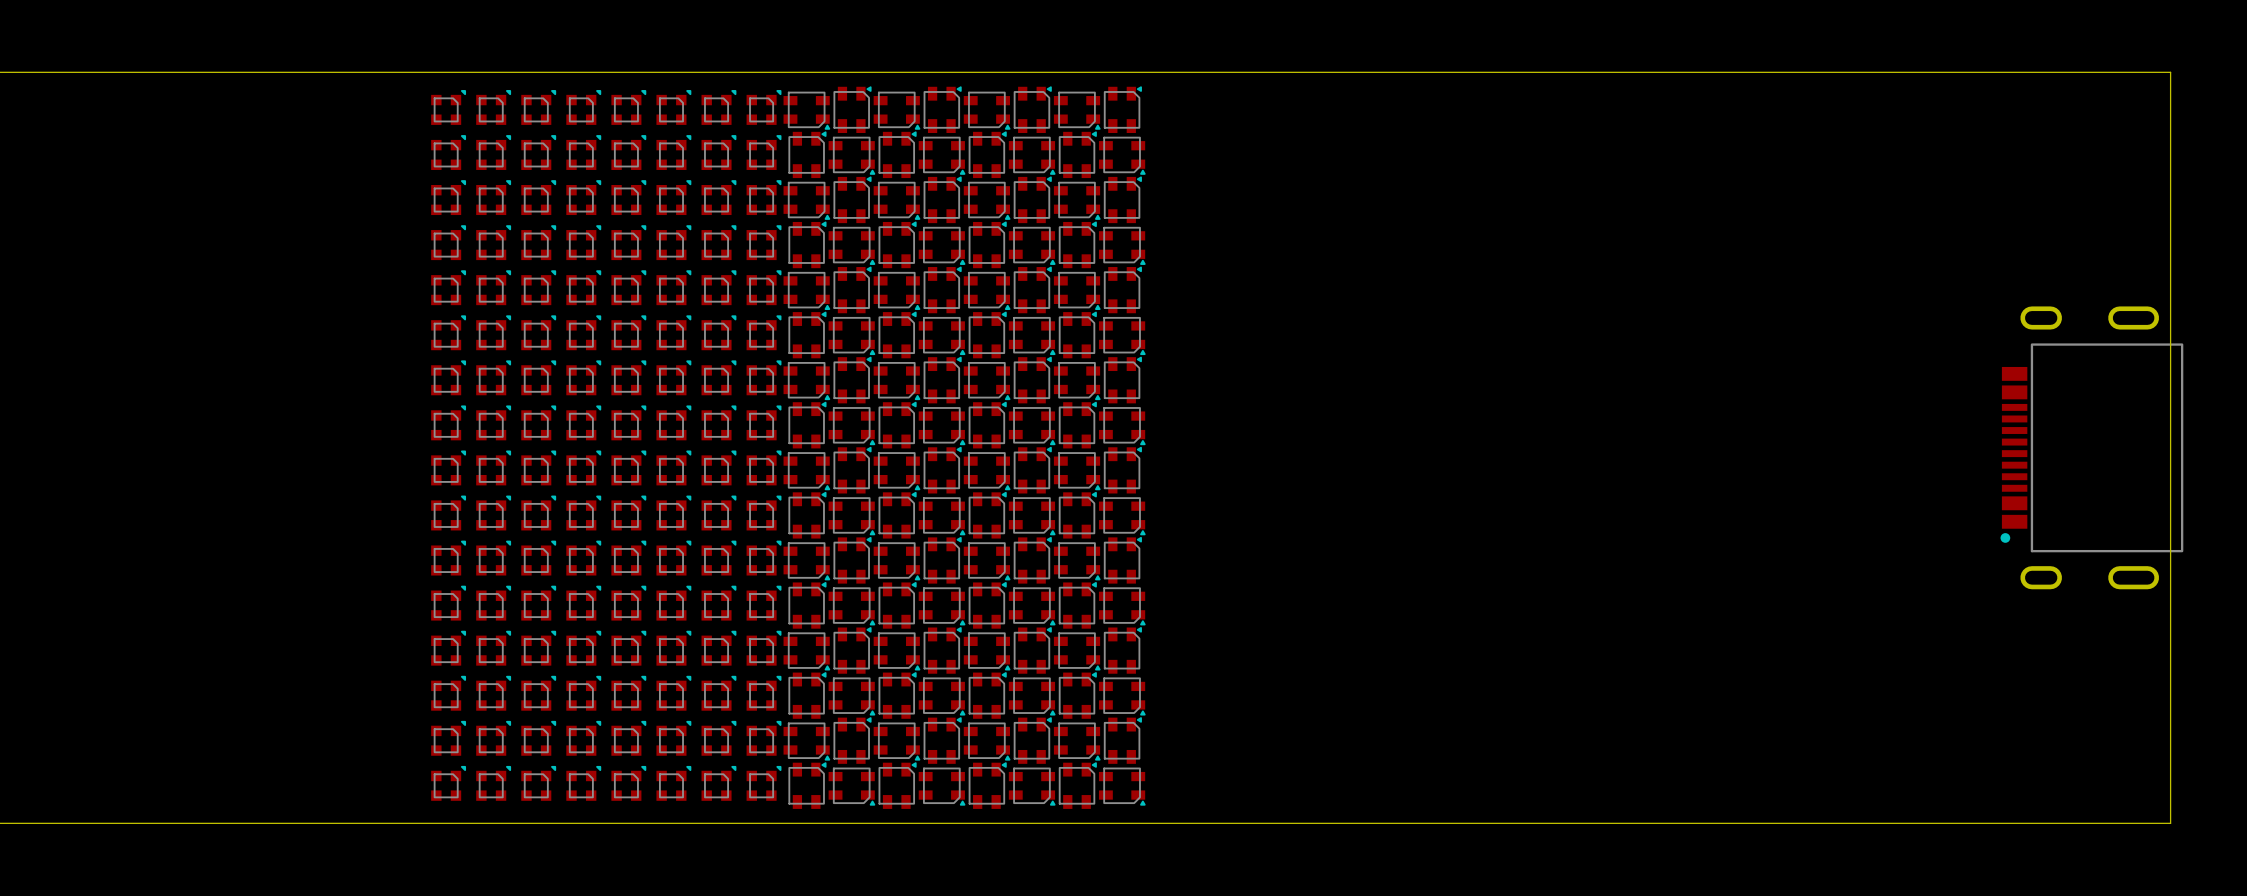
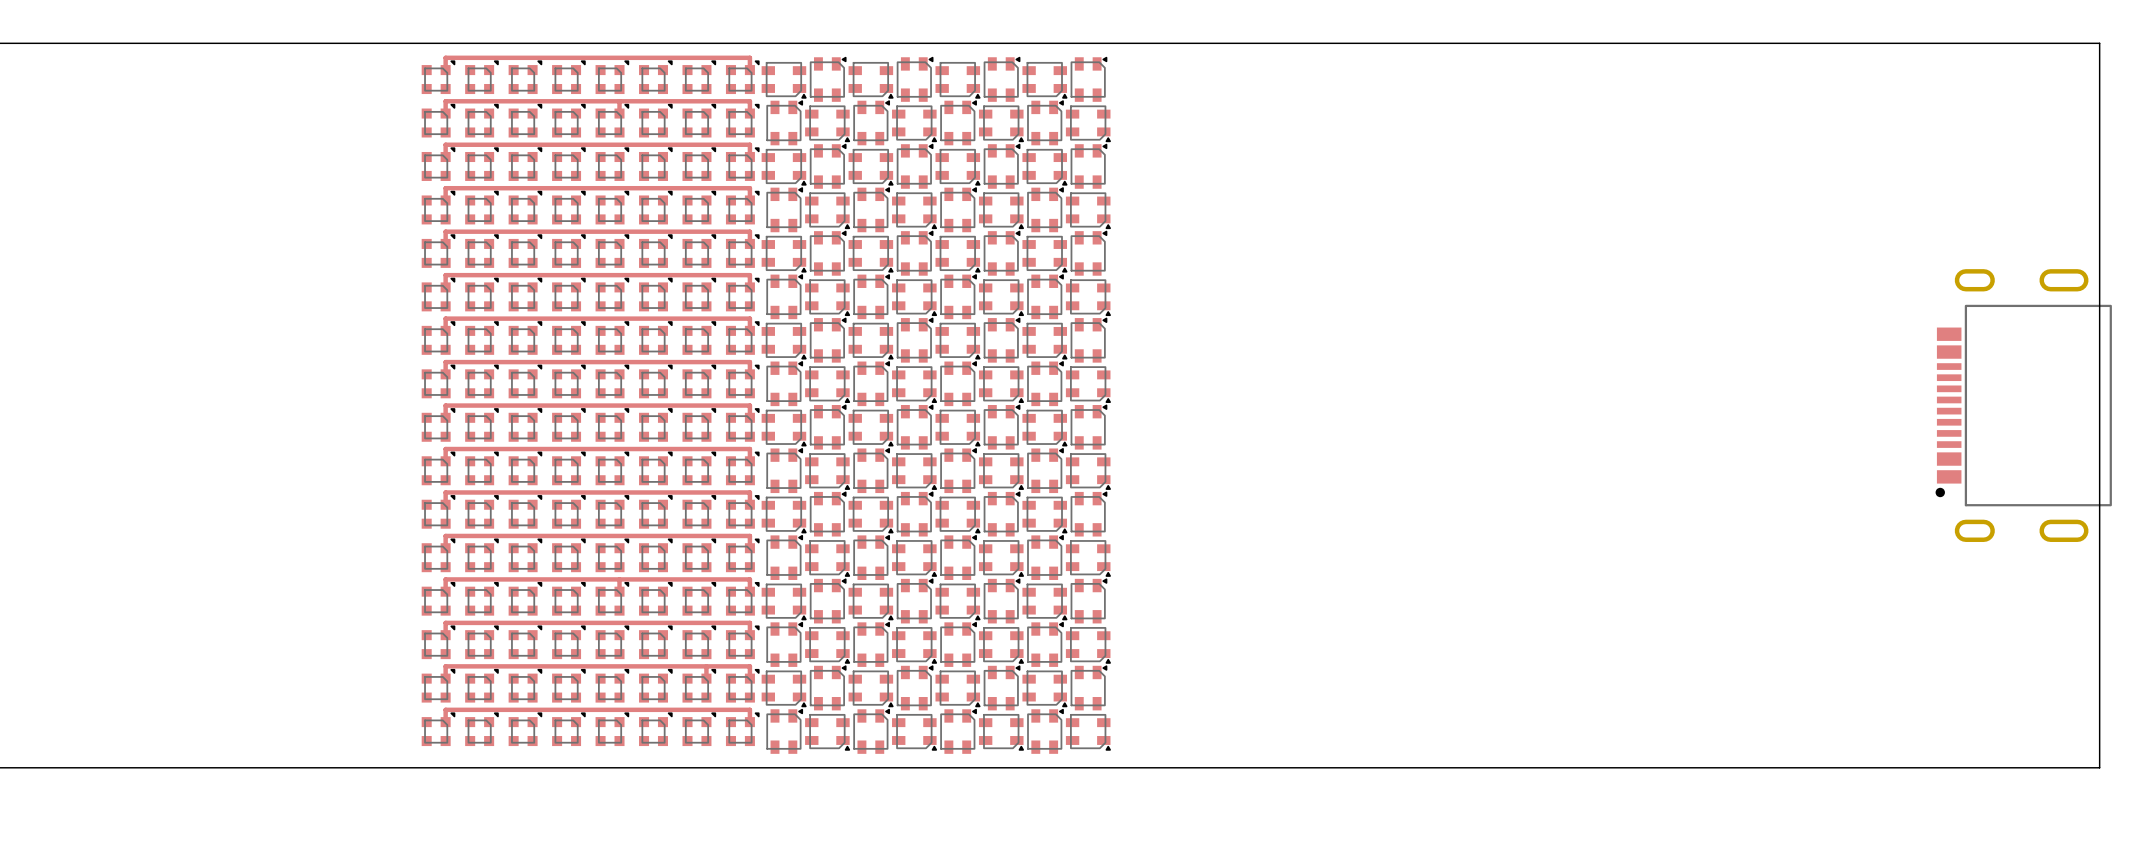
track: none -> (445, 70) (445, 57) (749, 57) (749, 70)
track: none -> (619, 101) (619, 113)
track: none -> (445, 113) (445, 101) (749, 101) (749, 113)
track: none -> (445, 157) (445, 144) (749, 144) (749, 157)
track: none -> (445, 200) (445, 188) (749, 188) (749, 200)
track: none -> (445, 243) (445, 231) (749, 231) (749, 243)
track: none -> (445, 287) (445, 275) (749, 275) (749, 287)
track: none -> (445, 330) (445, 318) (749, 318) (749, 330)
track: none -> (445, 374) (445, 362) (749, 362) (749, 374)
track: none -> (445, 417) (445, 405) (749, 405) (749, 417)
track: none -> (445, 461) (445, 449) (749, 449) (749, 461)
track: none -> (445, 504) (445, 492) (749, 492) (749, 504)
track: none -> (445, 548) (445, 535) (749, 535) (749, 548)
track: none -> (619, 579) (619, 591)
track: none -> (445, 591) (445, 579) (749, 579) (749, 591)
track: none -> (445, 635) (445, 622) (749, 622) (749, 635)
track: none -> (706, 666) (706, 678)
track: none -> (445, 678) (445, 666) (749, 666) (749, 678)
track: none -> (445, 722) (445, 709) (749, 709) (749, 722)

